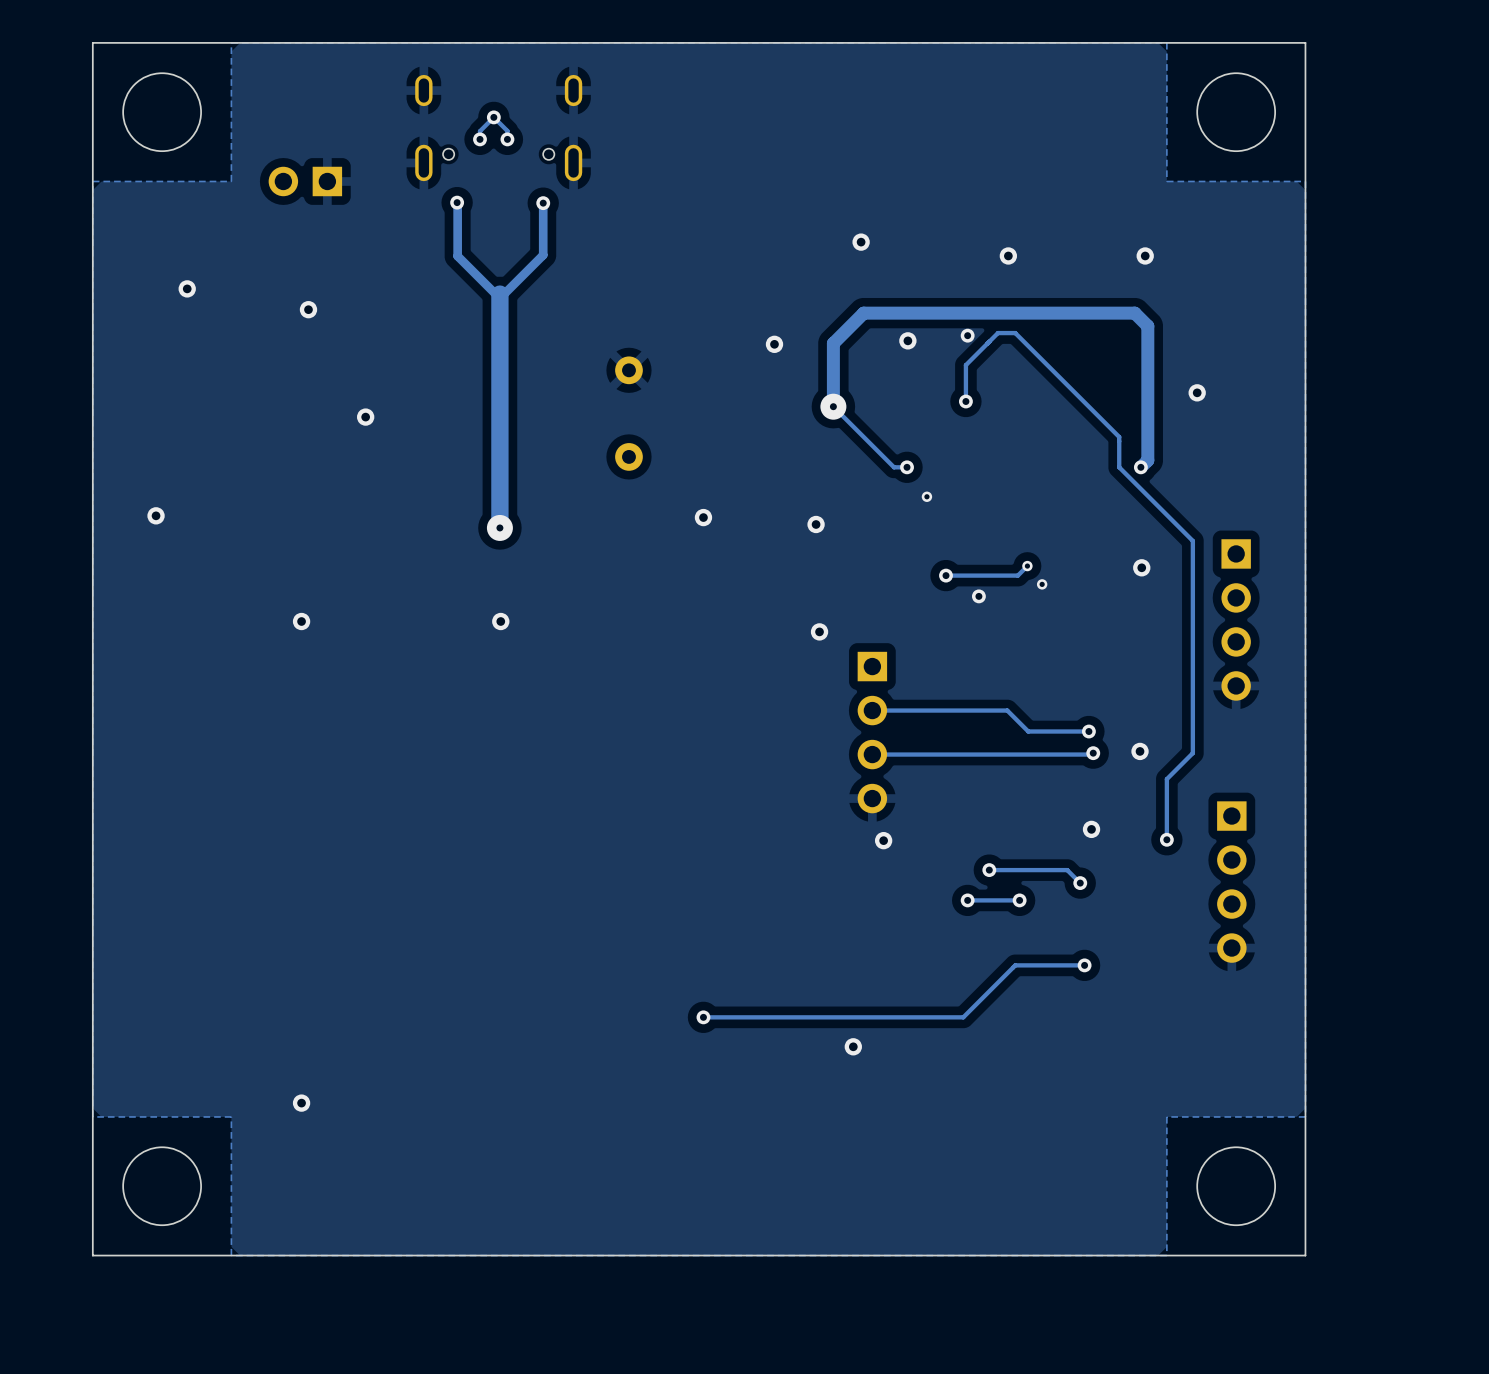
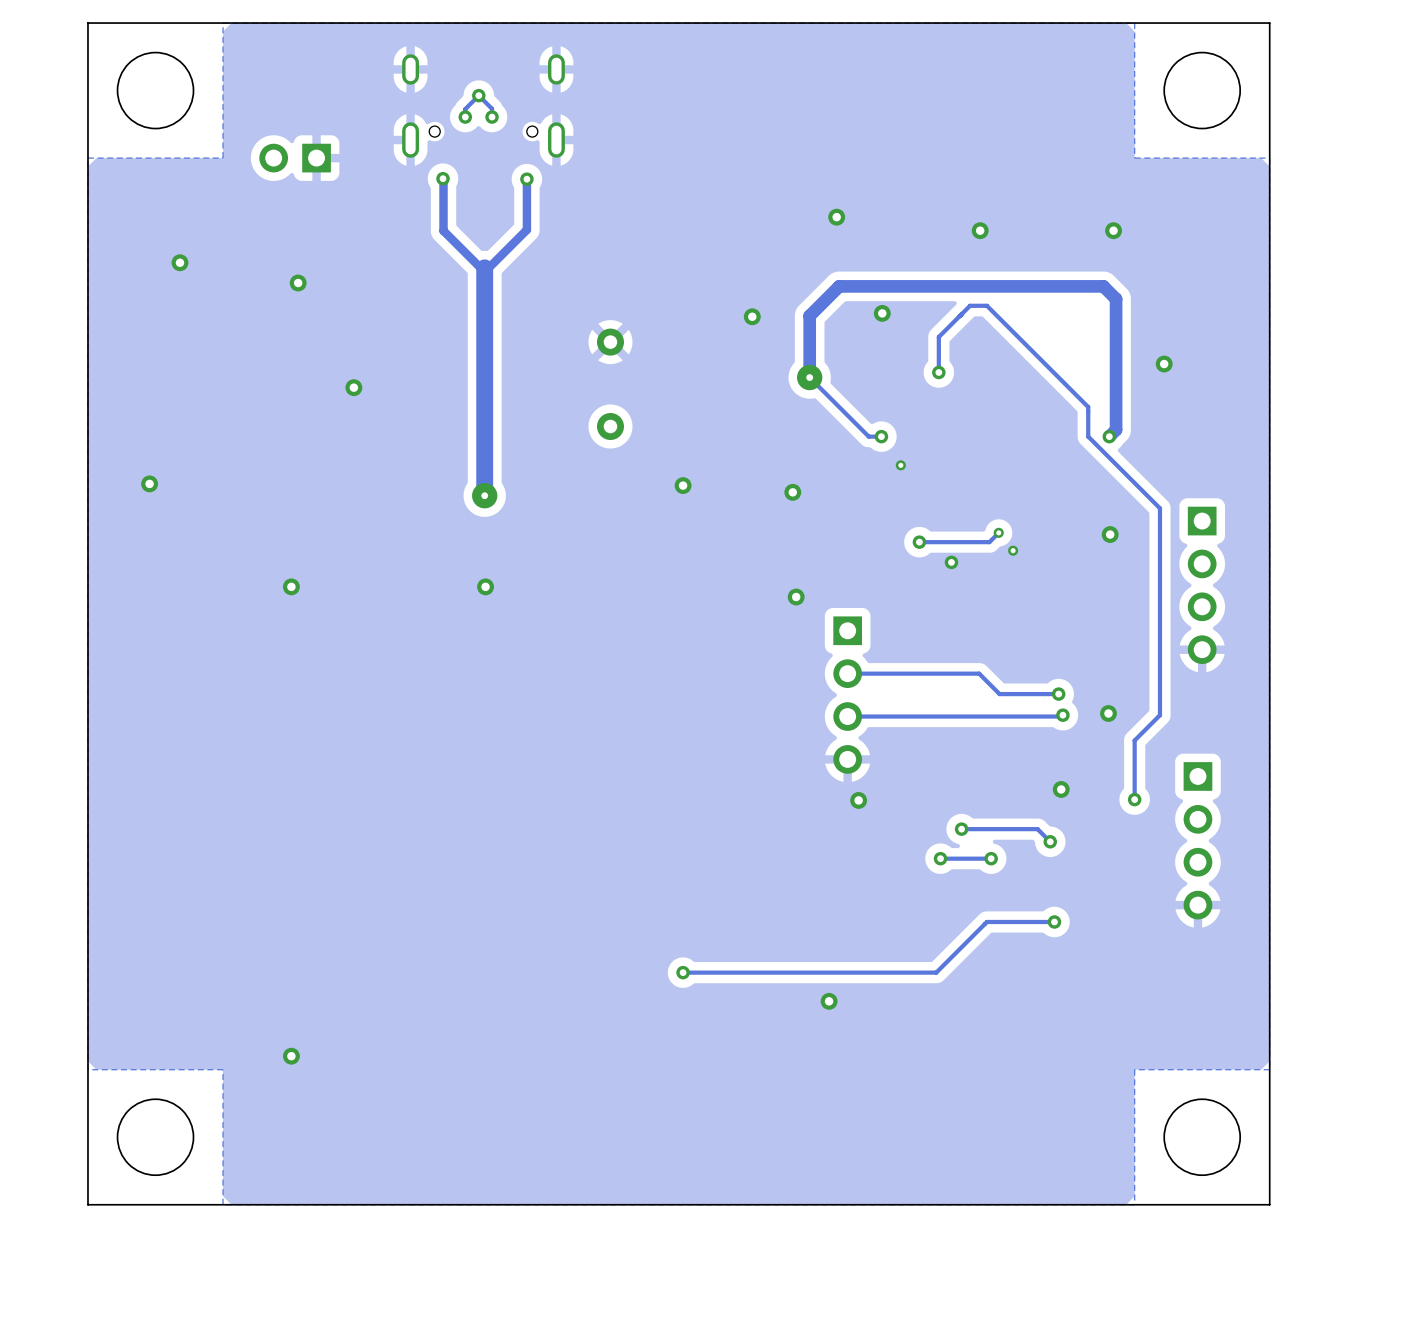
via: (967, 335) -> none

